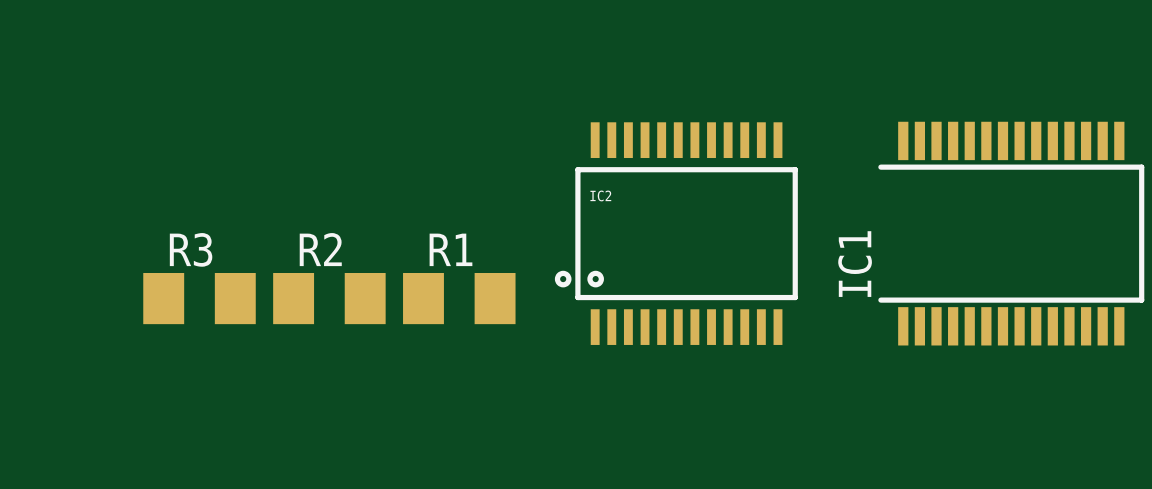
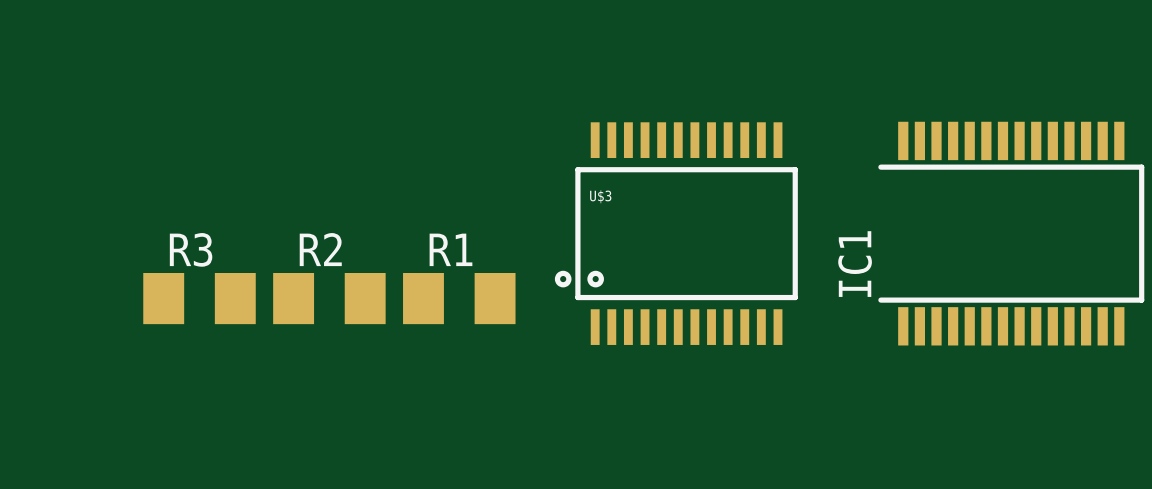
IC2 name: IC2 (600, 195) -> U$3 (600, 196)

